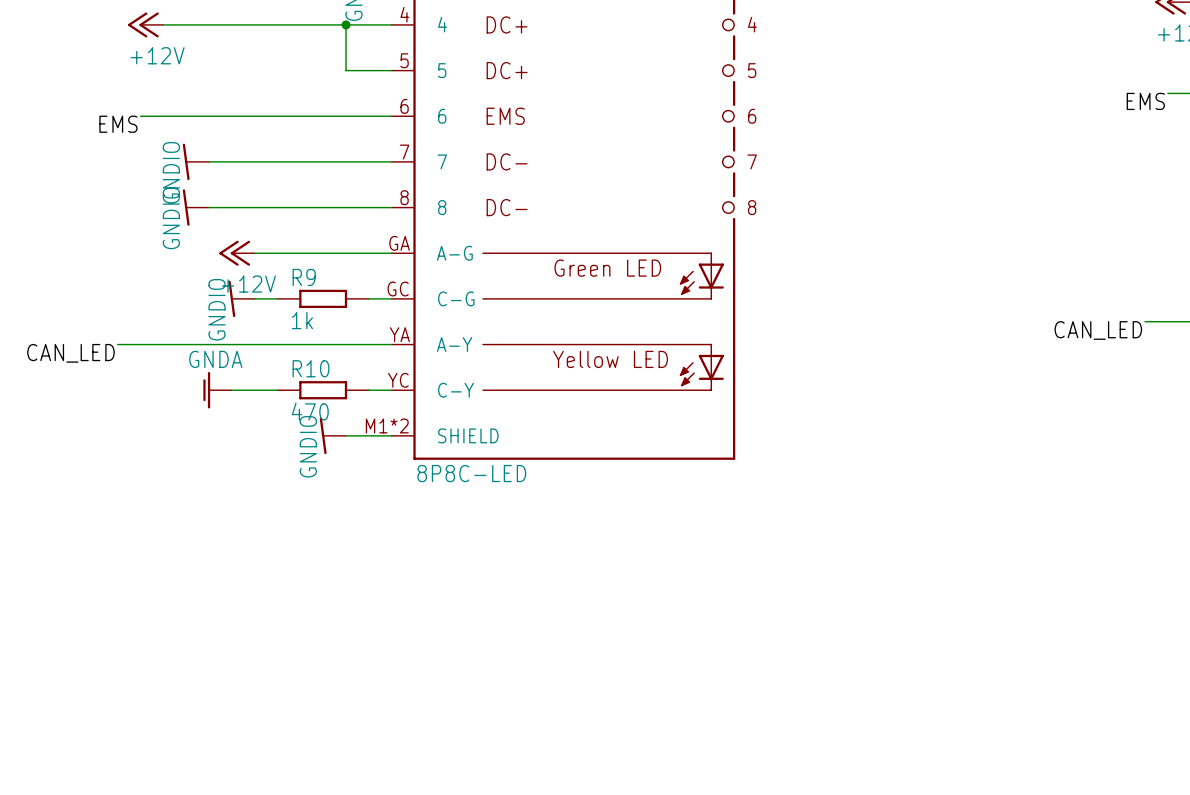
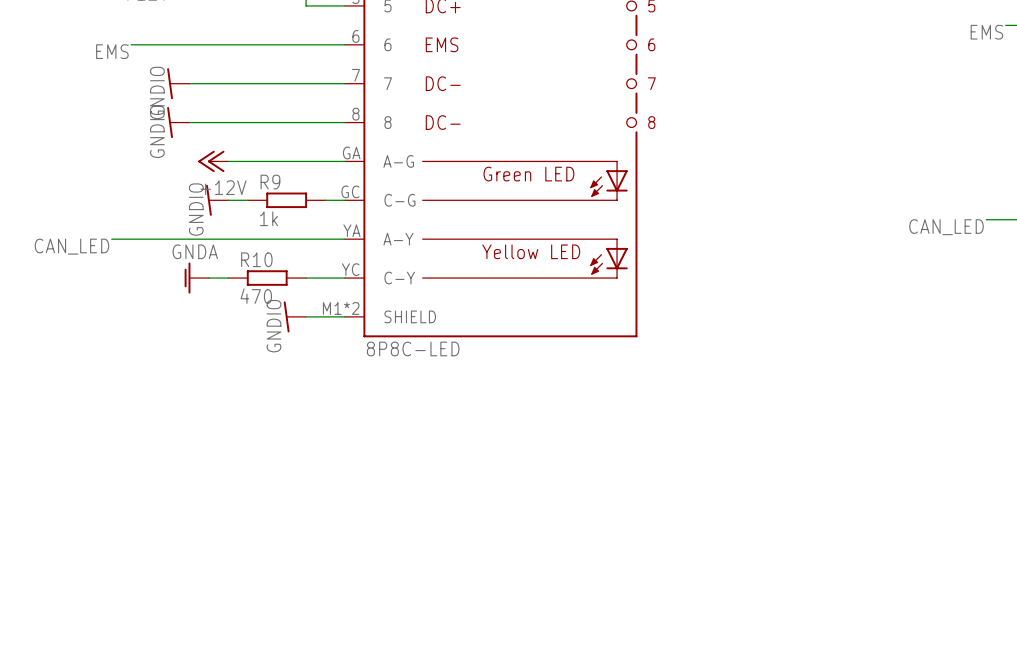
R10 position: (323, 390) -> (267, 278)

